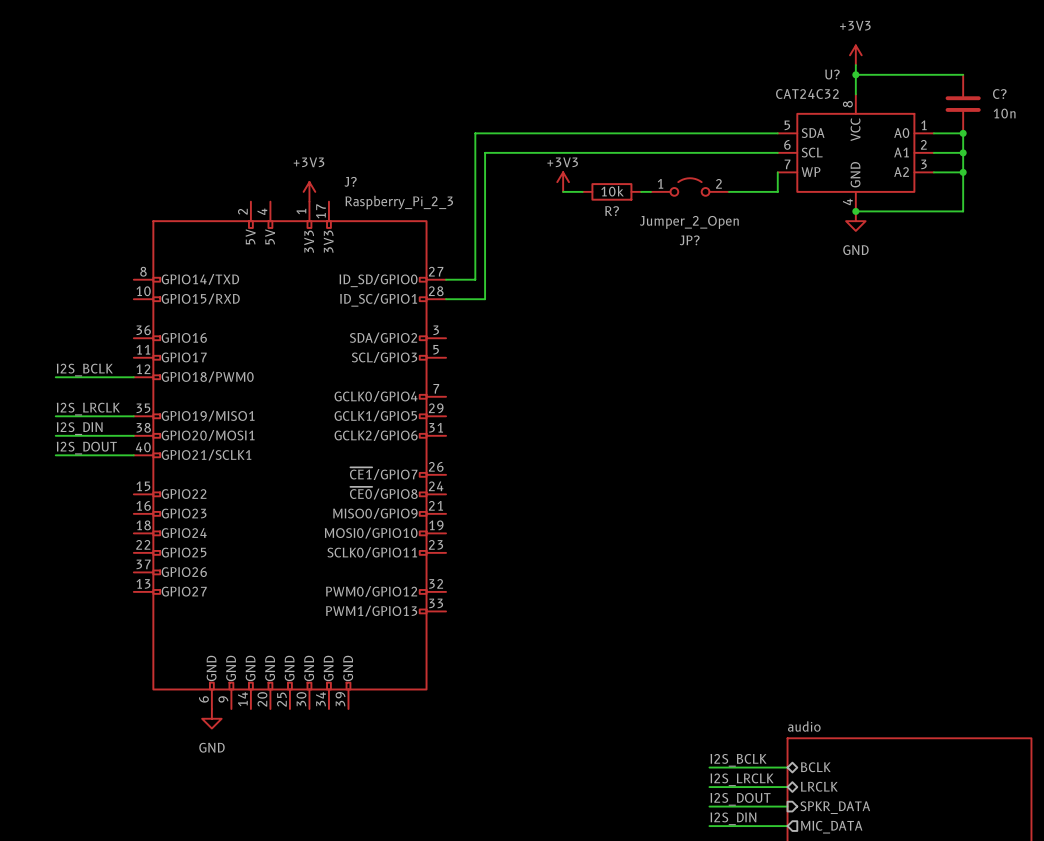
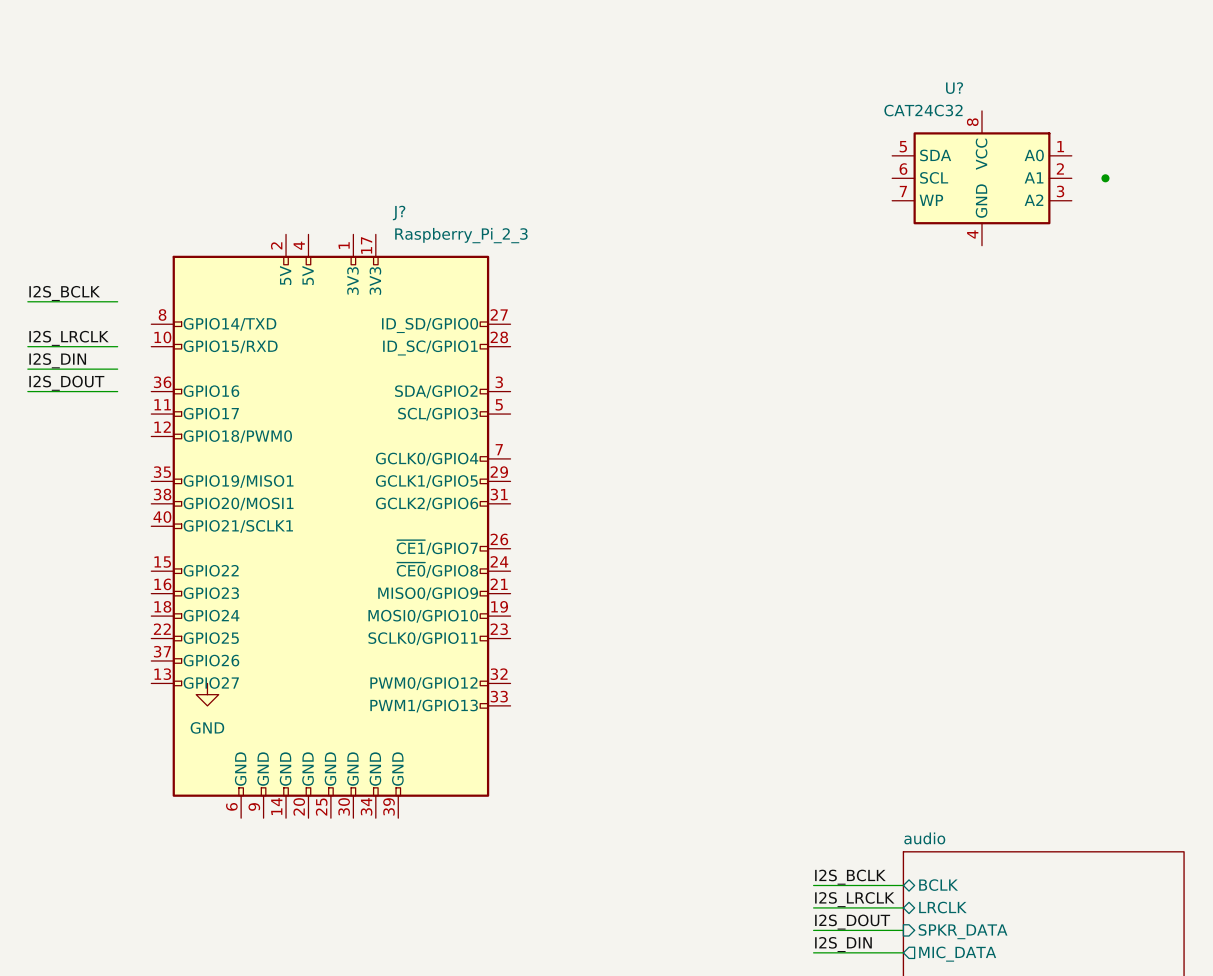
power symbol: +3V3 (855, 55) -> none
wire: (855, 65) (855, 94) -> none
wire: (855, 74) (963, 74) -> none
junction: (855, 74) -> none
C?: 10n (963, 104) -> none
wire: (777, 133) (475, 133) (475, 279) (446, 279) -> none
wire: (933, 133) (963, 133) (963, 211) (855, 211) -> none
junction: (963, 133) -> none
wire: (777, 152) (485, 152) (485, 299) (446, 299) -> none
wire: (933, 152) (963, 152) -> none
wire: (777, 172) (777, 191) (729, 191) -> none
wire: (933, 172) (963, 172) -> none
junction: (963, 172) -> none
power symbol: +3V3 (563, 182) -> none
JP?: Jumper_2_Open (689, 187) -> none
power symbol: +3V3 (309, 191) -> none
wire: (563, 191) (582, 191) -> none
R?: 10k (611, 191) -> none
wire: (641, 191) (650, 191) -> none
junction: (855, 211) -> none
power symbol: GND (855, 221) -> none
label position: I2S_BCLK (84, 370) -> I2S_BCLK (64, 293)
wire: (55, 377) (133, 377) -> (27, 301) (117, 301)
label position: I2S_LRCLK (88, 409) -> I2S_LRCLK (69, 338)
wire: (55, 416) (133, 416) -> (27, 346) (117, 346)
label position: I2S_DIN (79, 428) -> I2S_DIN (57, 360)
wire: (55, 435) (133, 435) -> (27, 369) (117, 369)
label position: I2S_DOUT (86, 448) -> I2S_DOUT (66, 383)
wire: (55, 455) (133, 455) -> (27, 391) (117, 391)
power symbol position: GND (211, 718) -> GND (207, 694)

